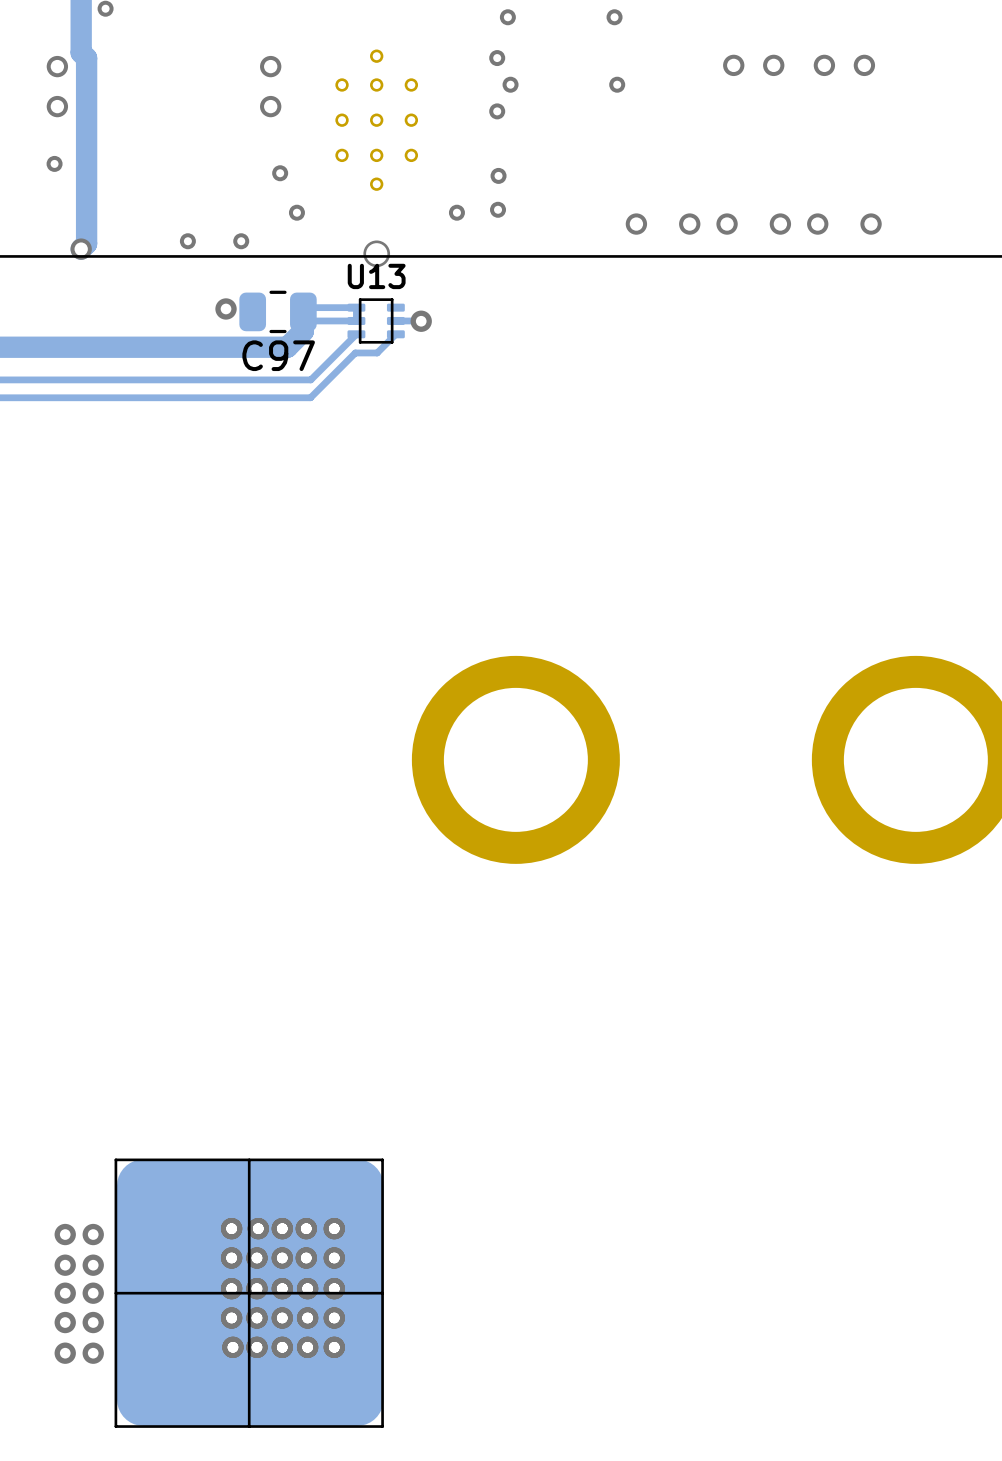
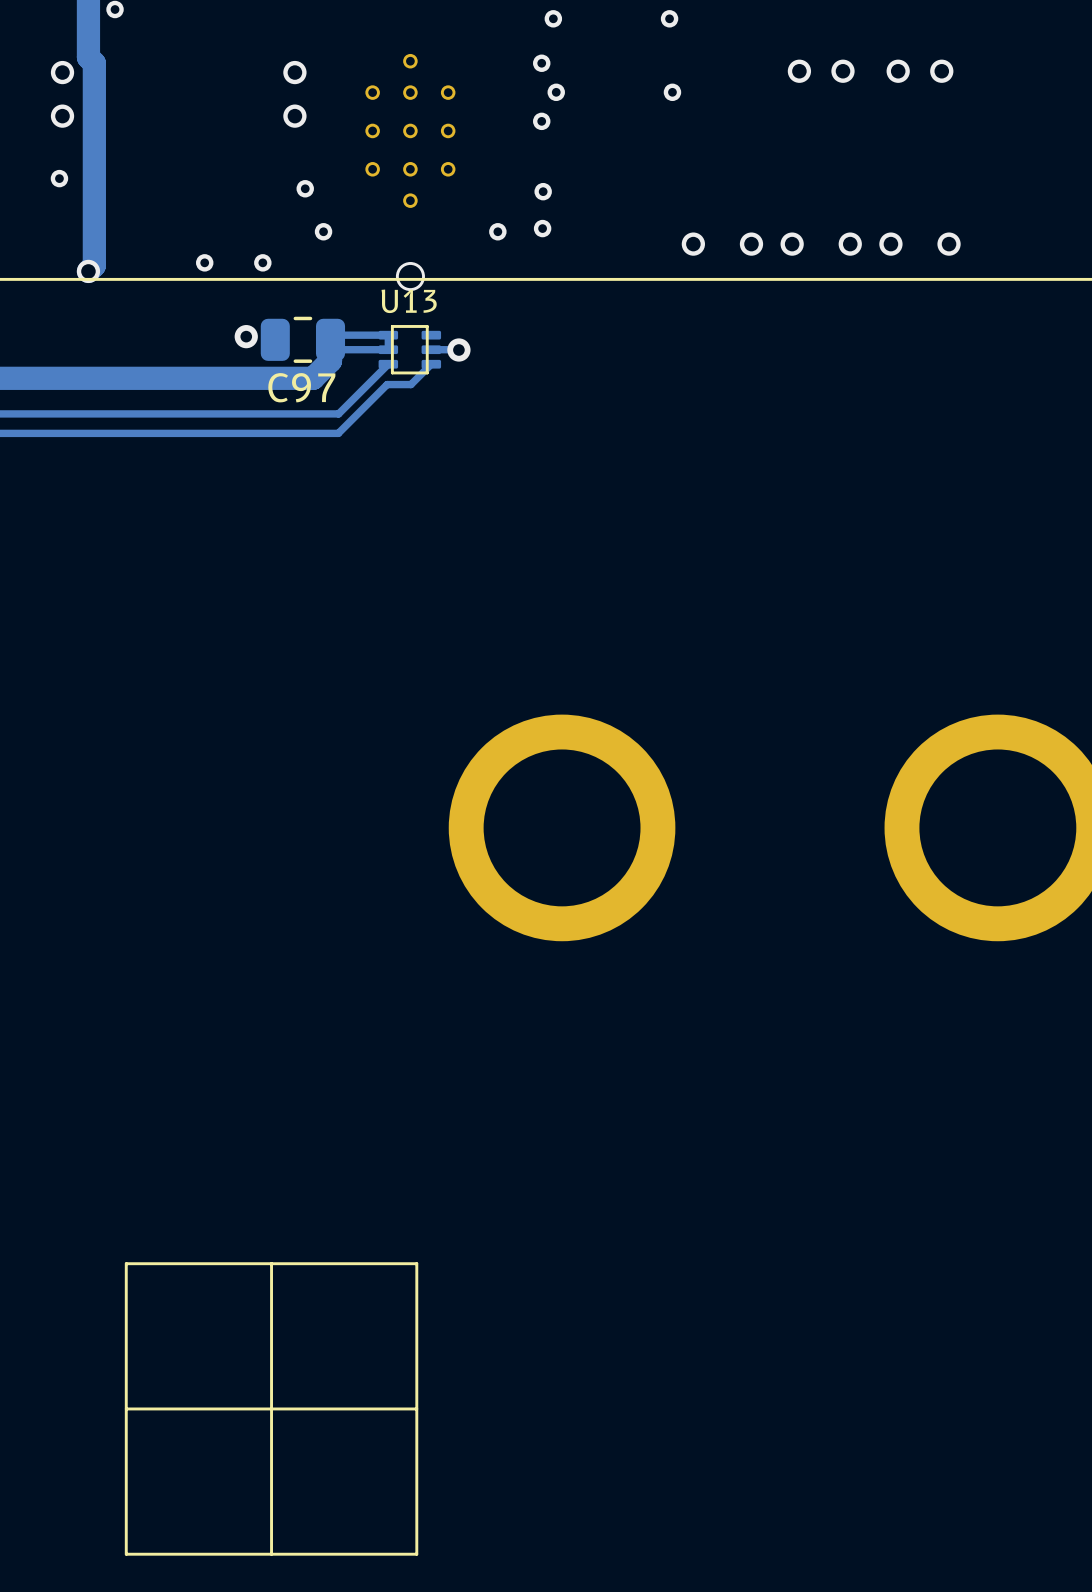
via: (231, 1228) -> none
via: (258, 1228) -> none
via: (282, 1228) -> none
via: (306, 1228) -> none
via: (334, 1228) -> none
via: (65, 1234) -> none
via: (93, 1234) -> none
via: (231, 1257) -> none
via: (256, 1257) -> none
via: (282, 1257) -> none
via: (306, 1257) -> none
via: (334, 1257) -> none
via: (65, 1265) -> none
via: (93, 1265) -> none
via: (231, 1288) -> none
via: (256, 1288) -> none
via: (282, 1288) -> none
via: (307, 1288) -> none
via: (334, 1288) -> none
part: (250, 1292) -> none
via: (65, 1293) -> none
via: (93, 1293) -> none
via: (231, 1317) -> none
via: (256, 1317) -> none
via: (282, 1317) -> none
via: (307, 1317) -> none
via: (334, 1317) -> none
via: (65, 1322) -> none
via: (93, 1322) -> none
via: (232, 1347) -> none
via: (256, 1347) -> none
via: (282, 1347) -> none
via: (307, 1347) -> none
via: (334, 1347) -> none
via: (65, 1353) -> none
via: (93, 1353) -> none

